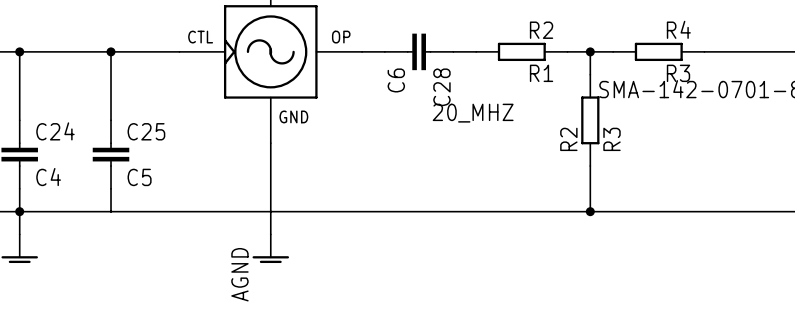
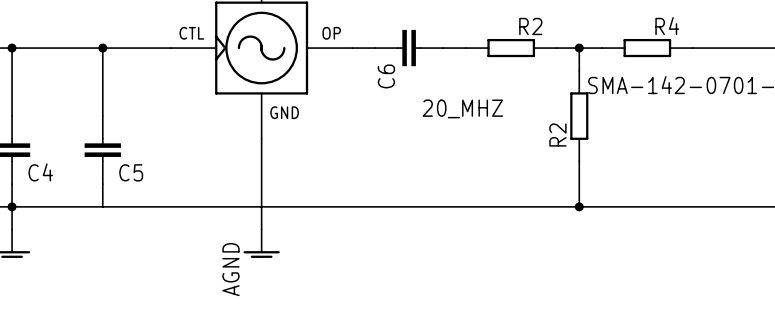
R1 name: R1 (541, 73) -> none
R3 name: R3 (678, 73) -> none
C28 name: C28 (441, 87) -> none
C24 name: C24 (55, 131) -> none
C25 name: C25 (146, 131) -> none
R2 value: R3 (612, 139) -> none

